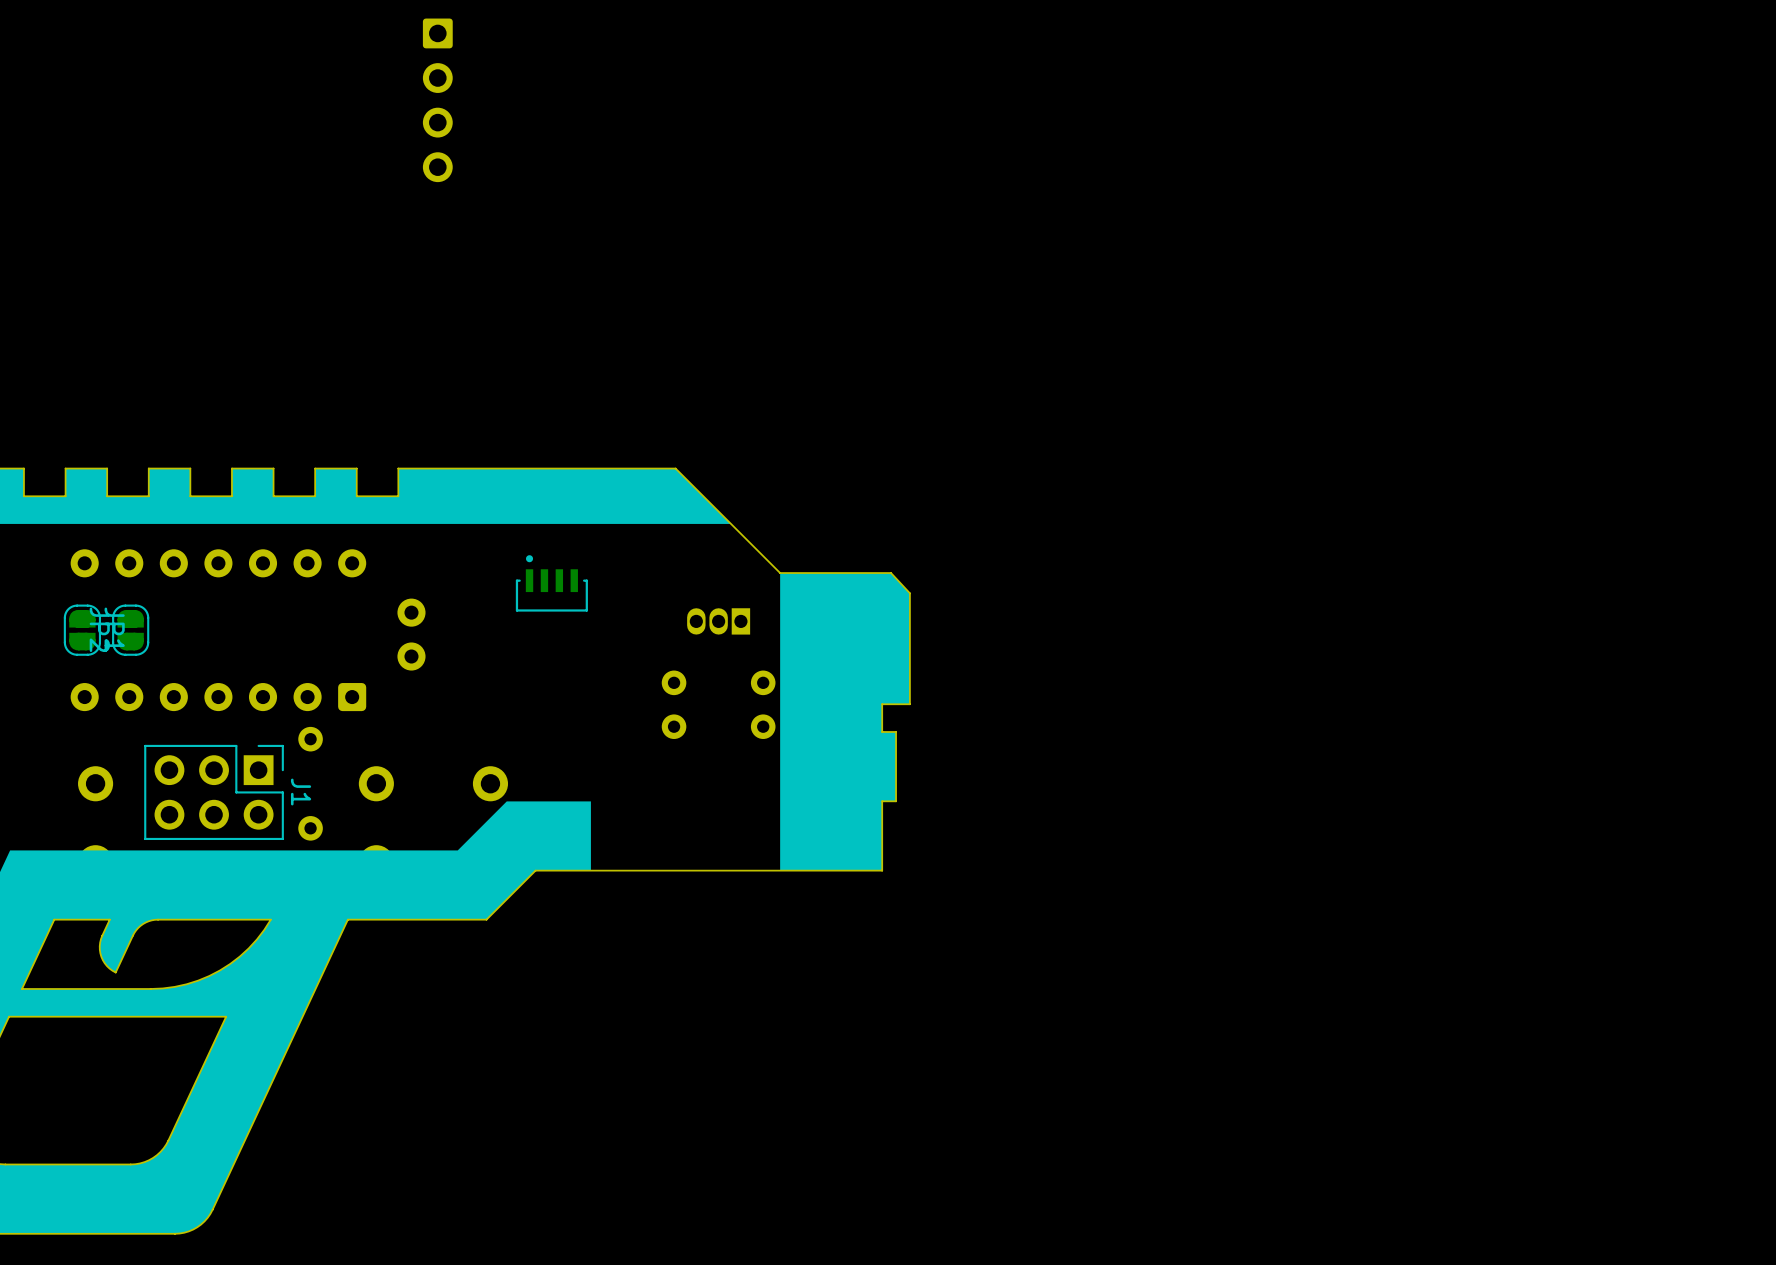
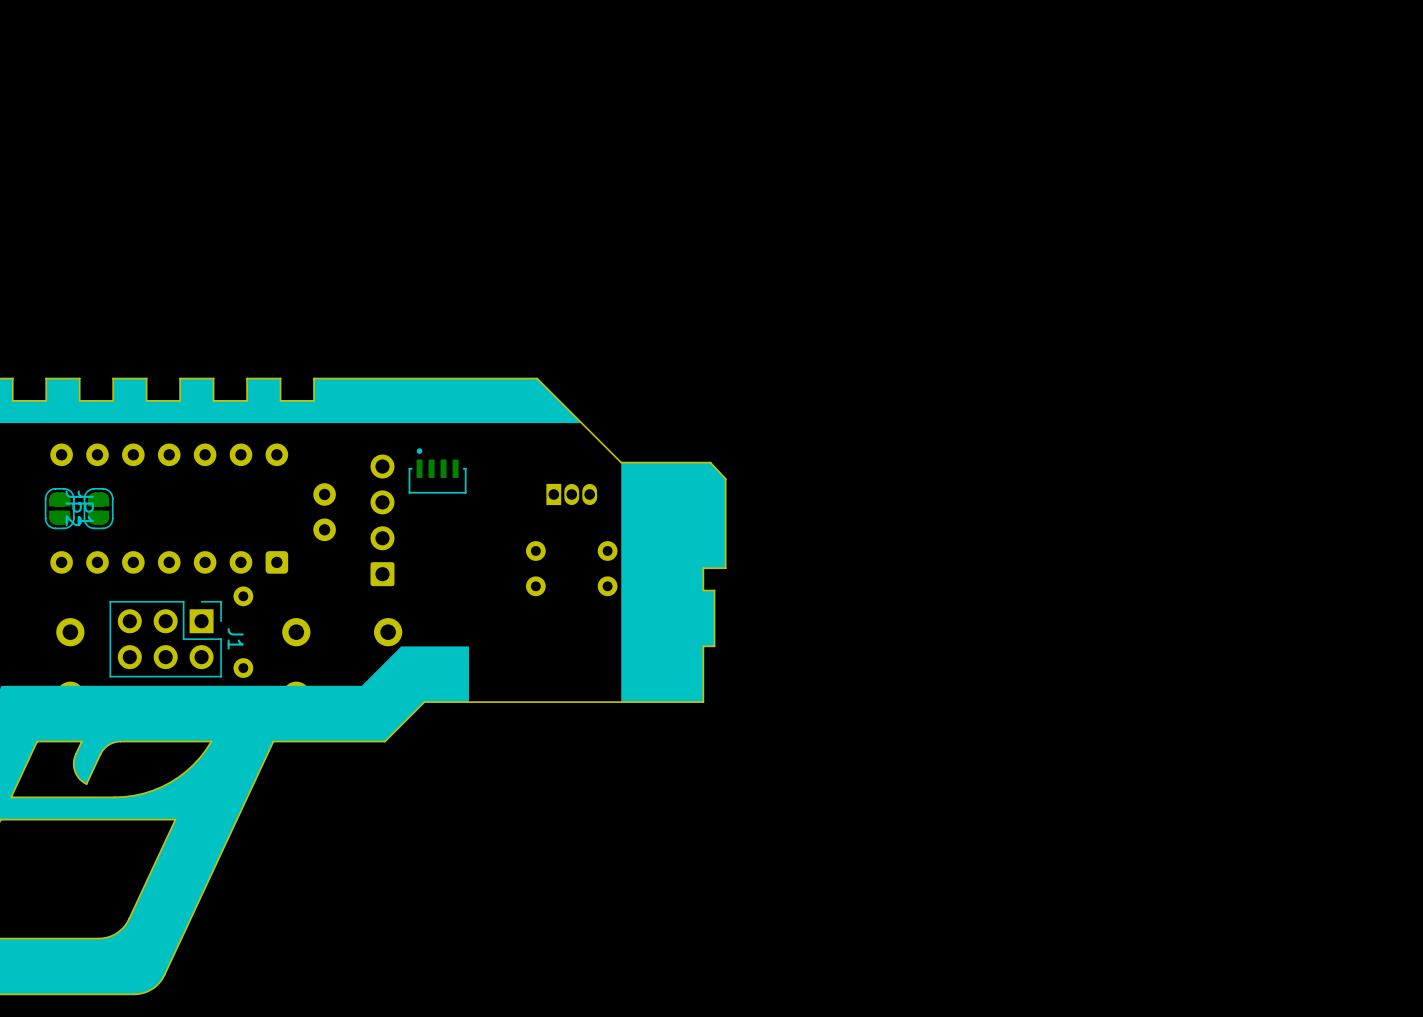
part: (437, 100) -> none
part rotation: 0° (718, 621) -> 180° (571, 494)
part: none -> (382, 520)

